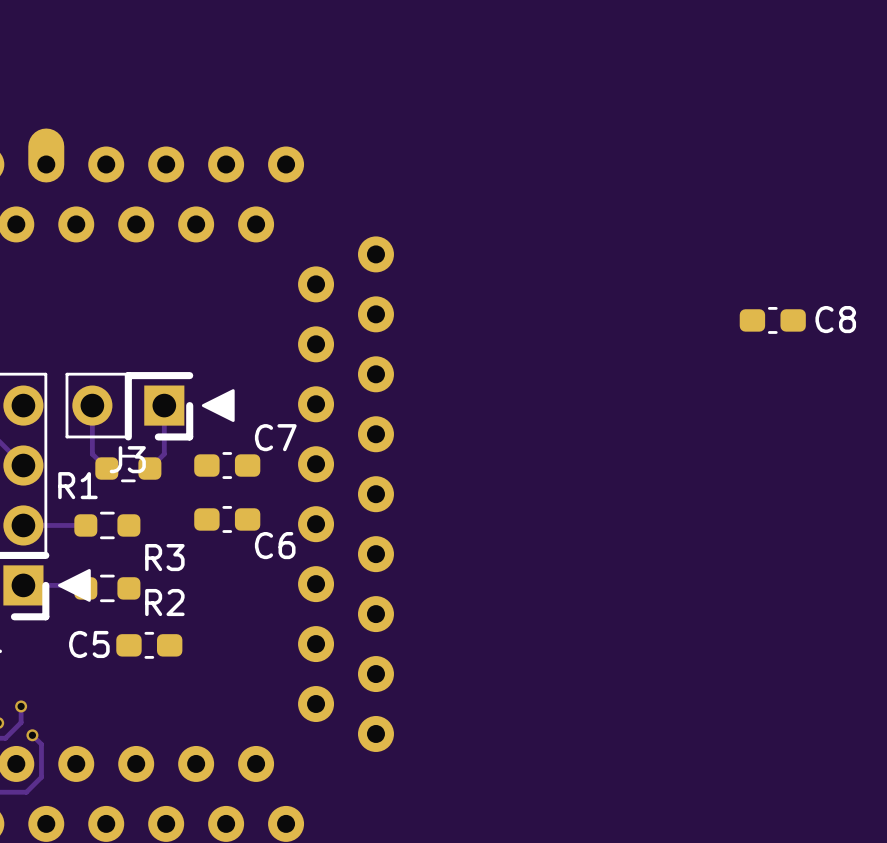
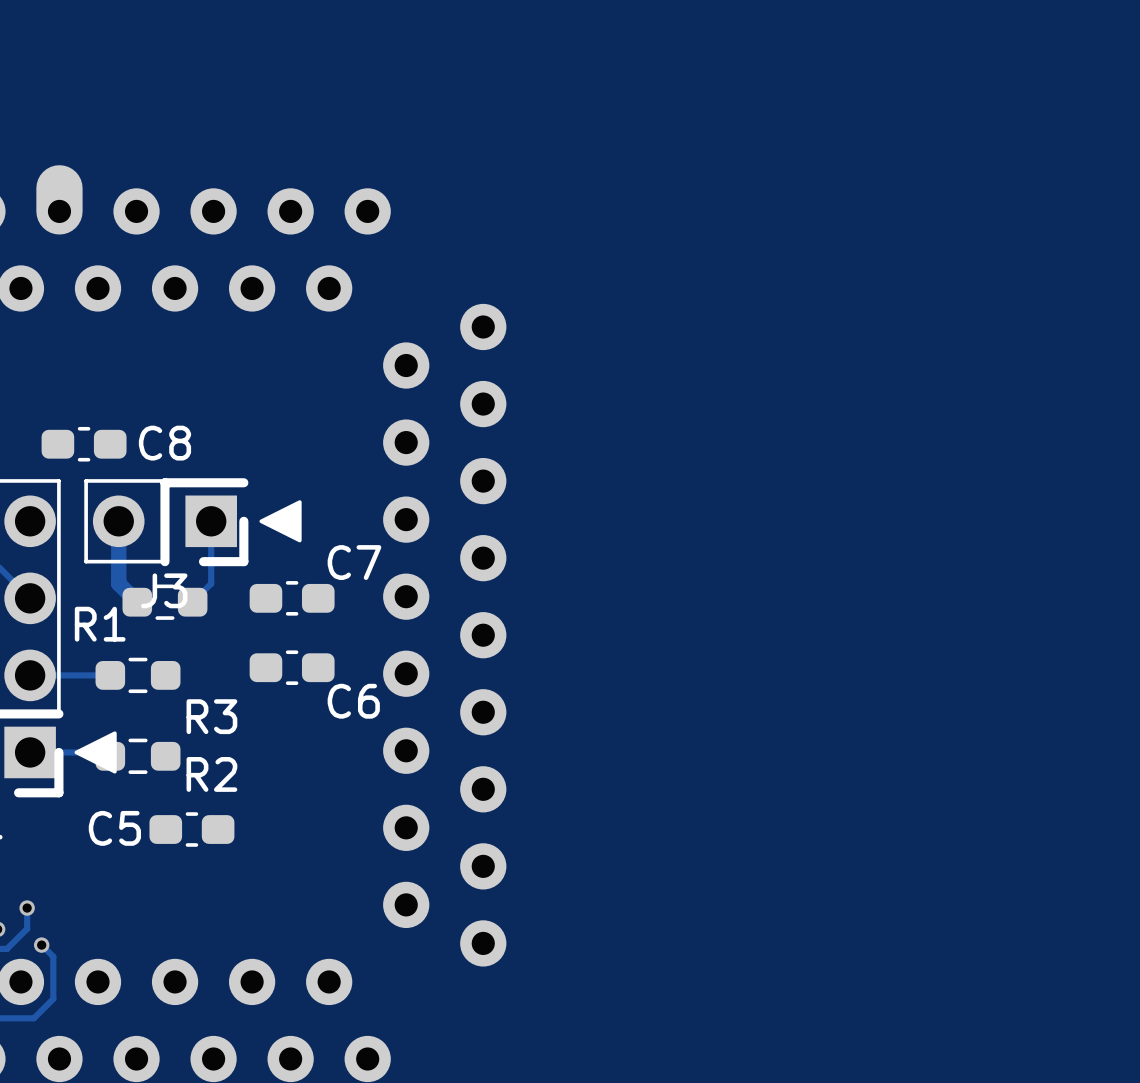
C8 position: (772, 320) -> (84, 444)
track width: thin (92, 405) (92, 454) (106, 468) -> thick (118, 521) (118, 583) (137, 602)

